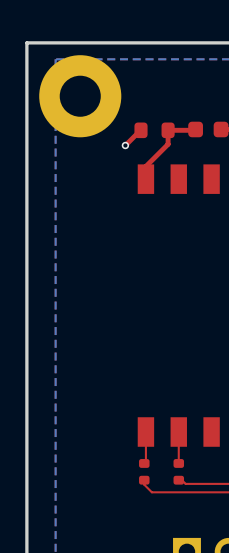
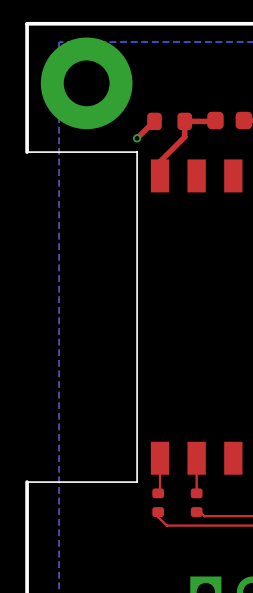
board edge: (26, 157) (26, 453) -> (27, 152) (137, 152) (137, 482) (27, 482)

